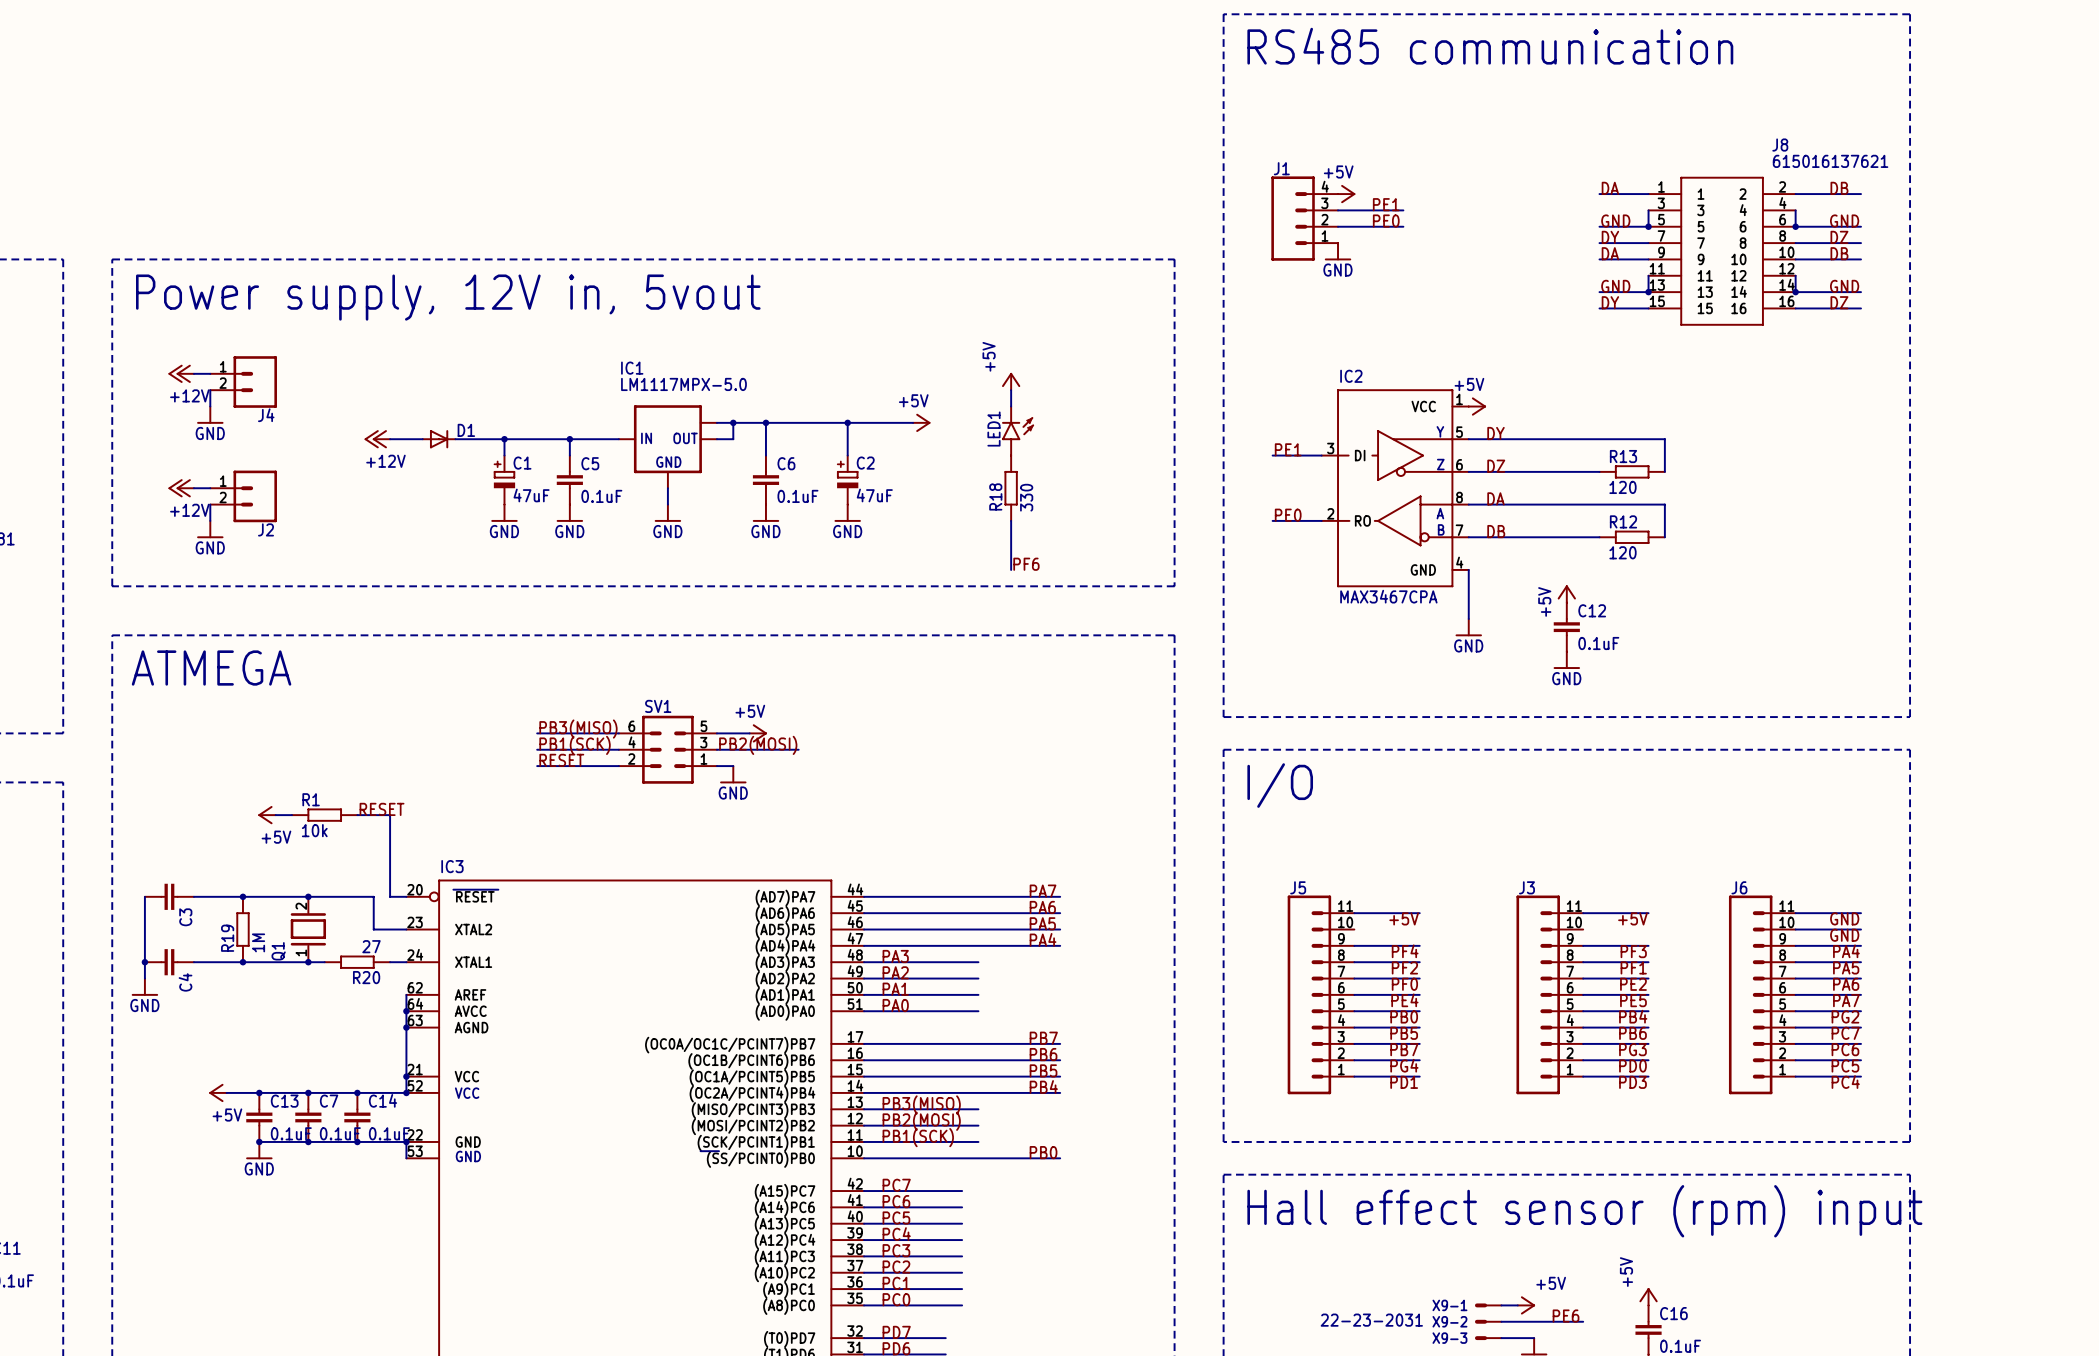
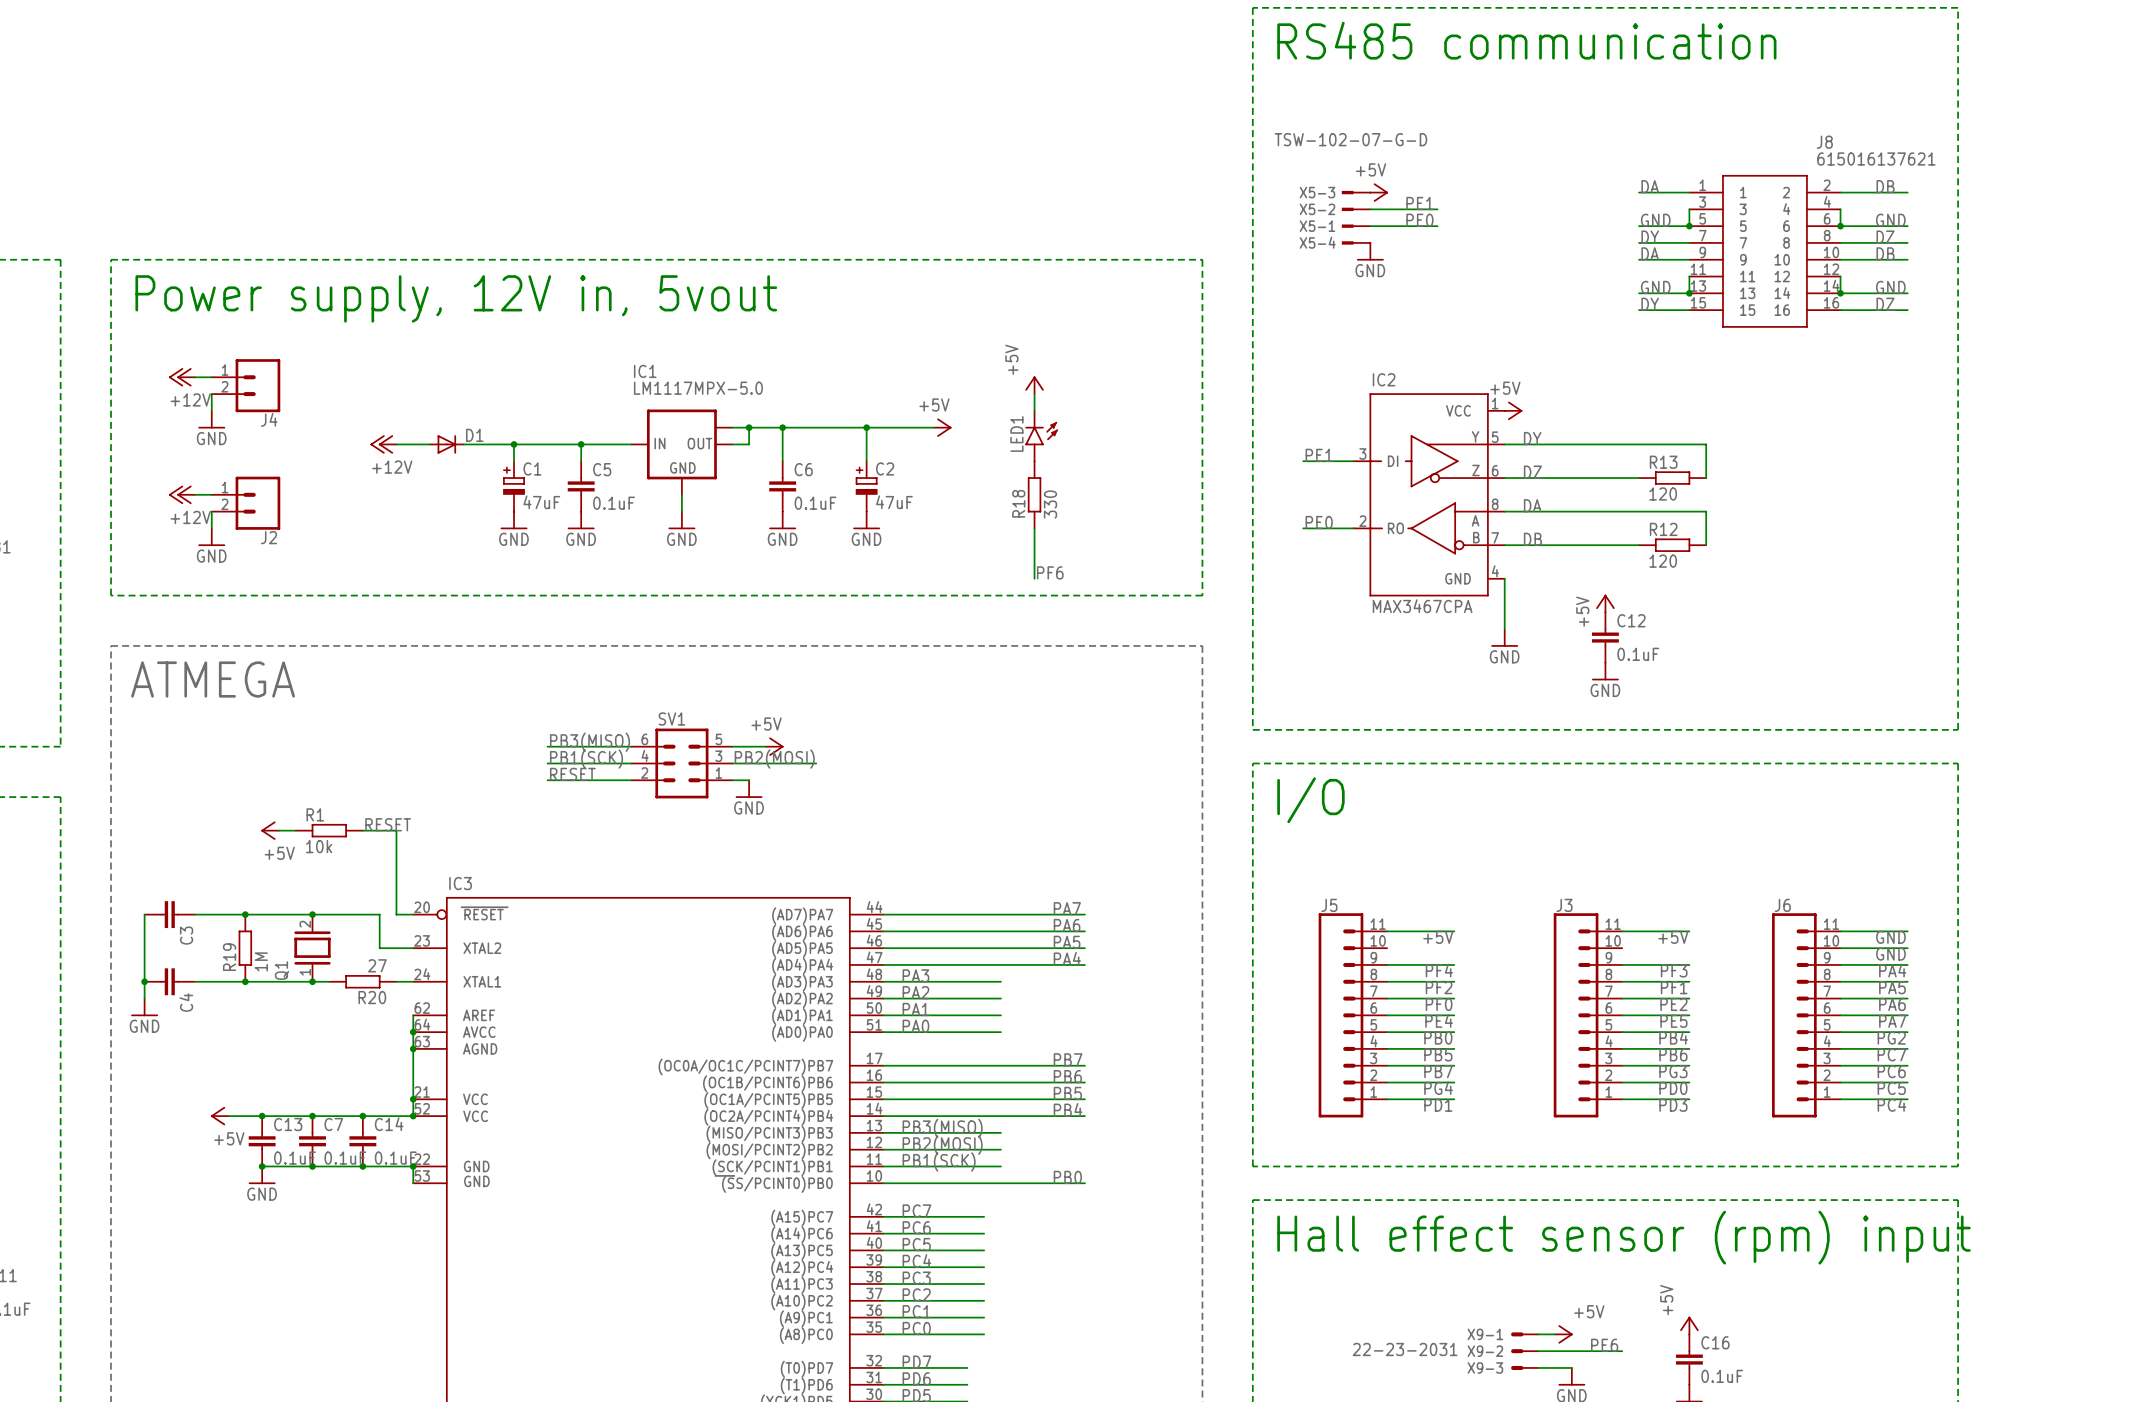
X5-3: none -> (1356, 192)
X5-2: none -> (1356, 209)
J1: (1304, 218) -> none
X5-1: none -> TSW-102-07-G-D (1356, 226)
X5-4: none -> (1356, 242)

